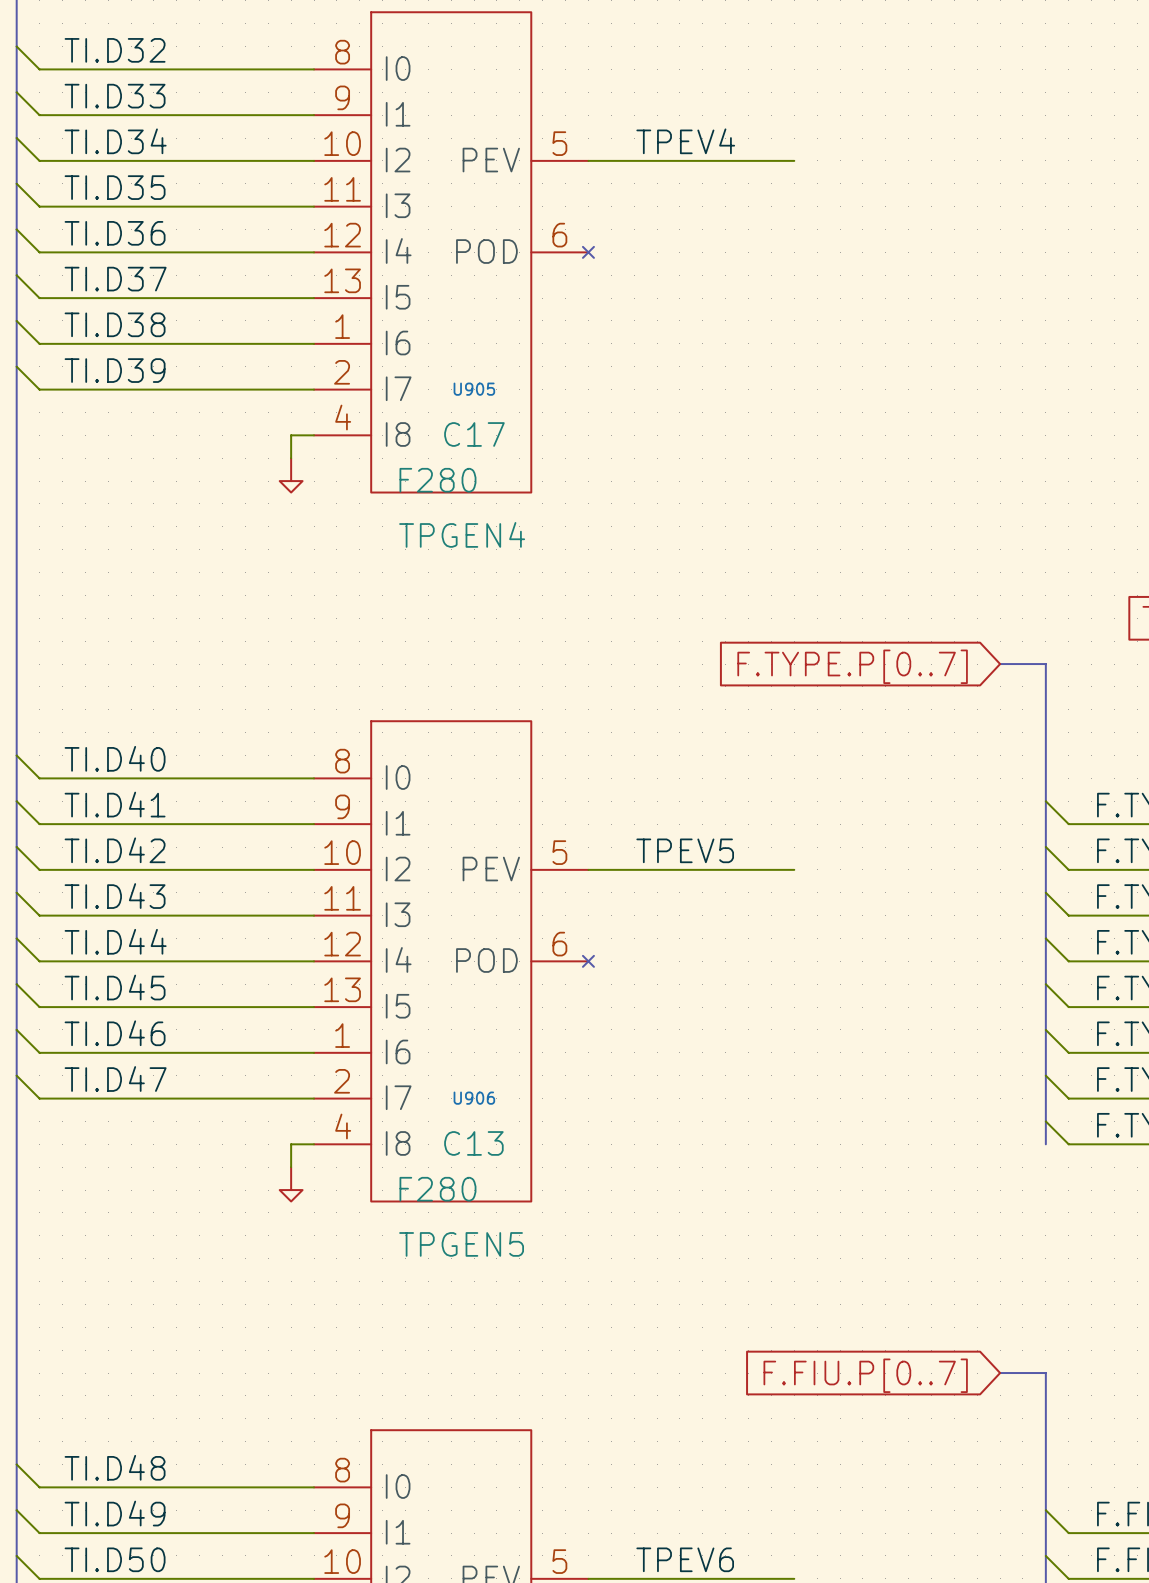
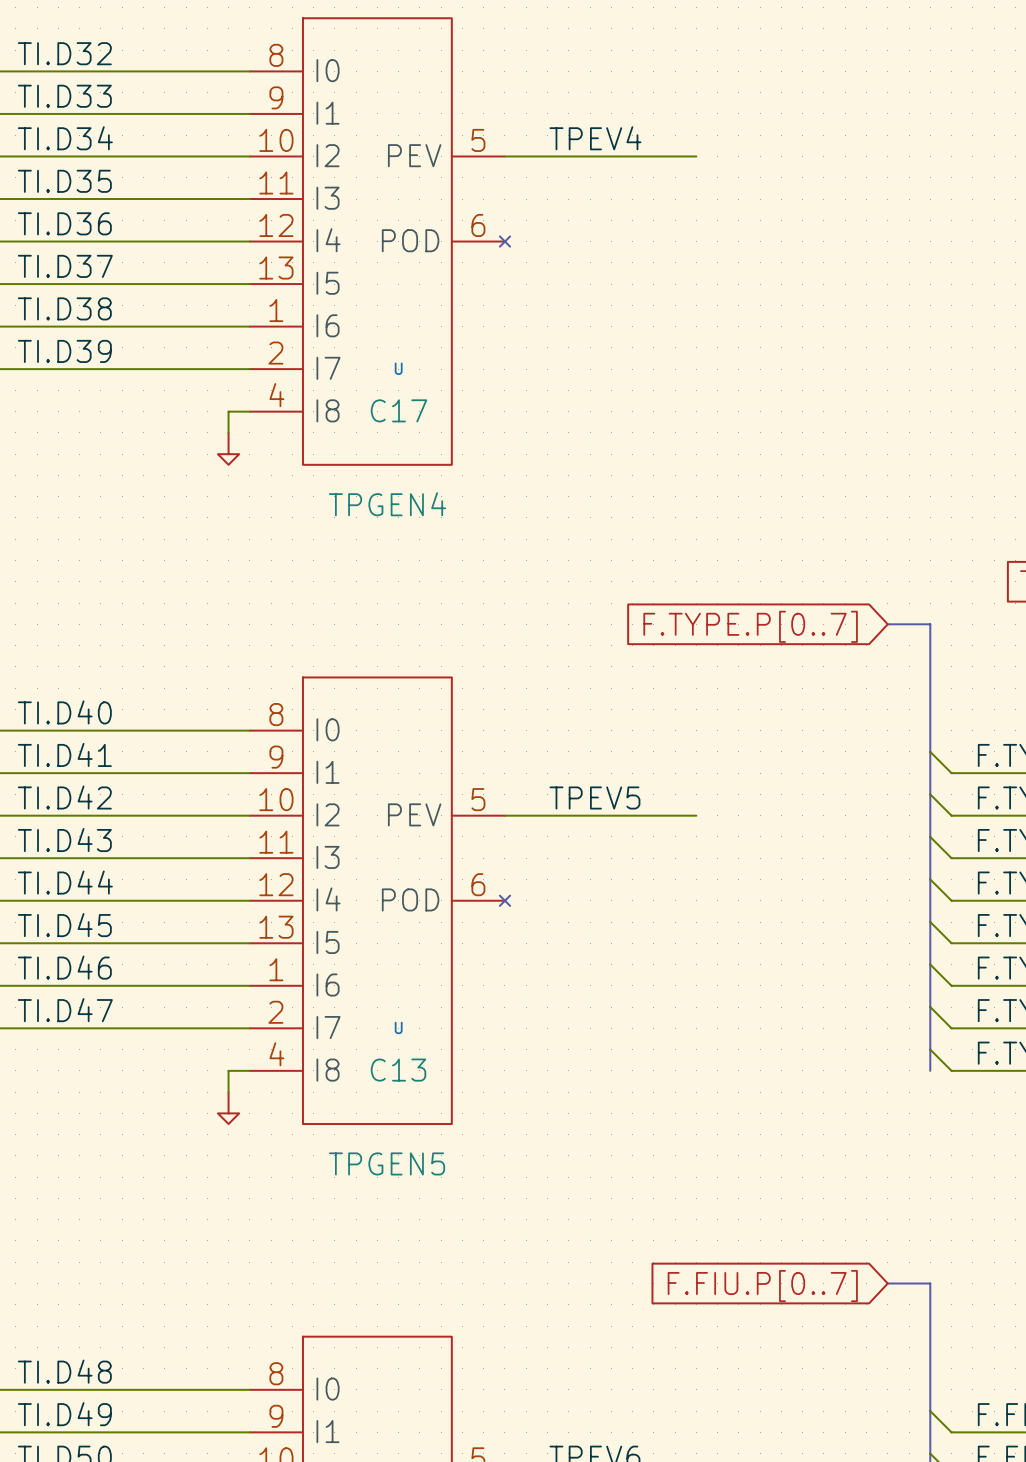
U905 name: U905 (474, 389) -> U (398, 368)
U905 value: F280 (437, 480) -> none
U906 name: U906 (474, 1098) -> U (398, 1027)
U906 value: F280 (437, 1189) -> none

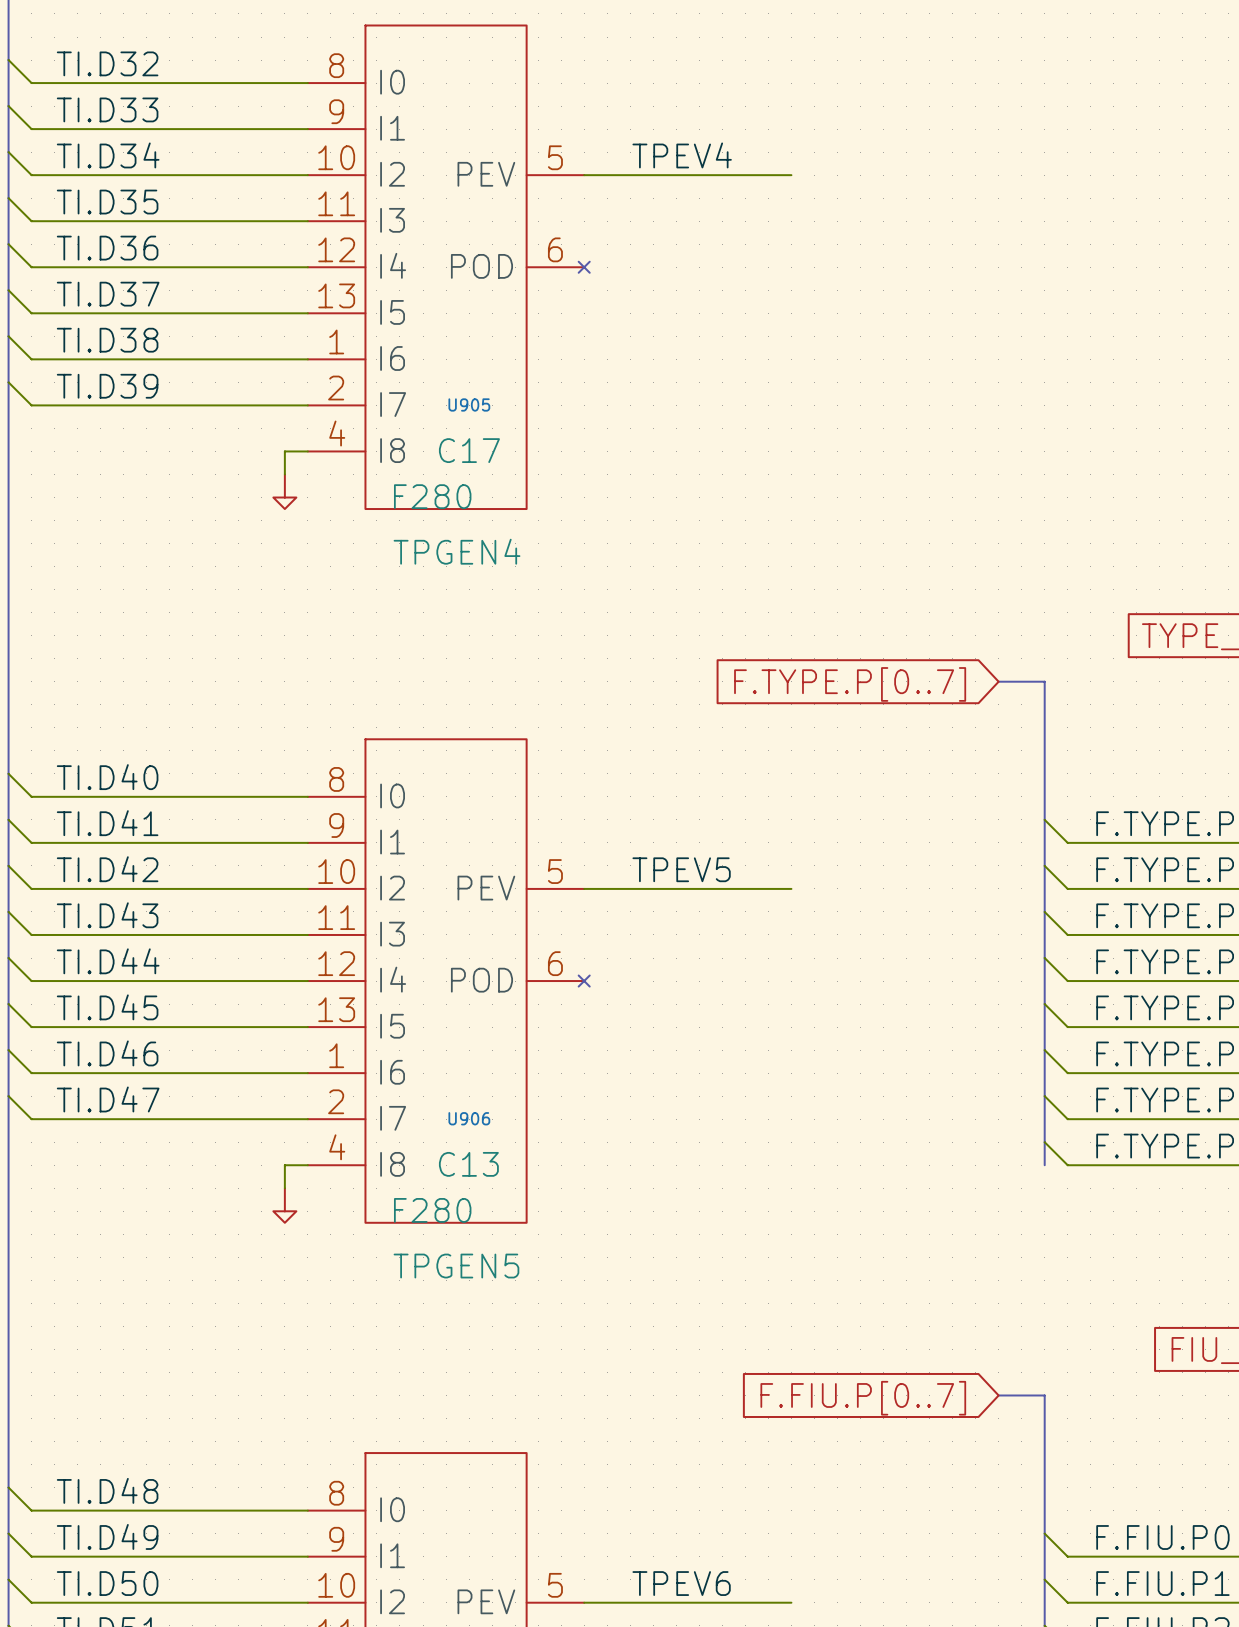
U name: U (398, 368) -> U905 (469, 404)
U value: none -> F280 (432, 496)
U name: U (398, 1027) -> U906 (469, 1118)
U value: none -> F280 (432, 1210)

